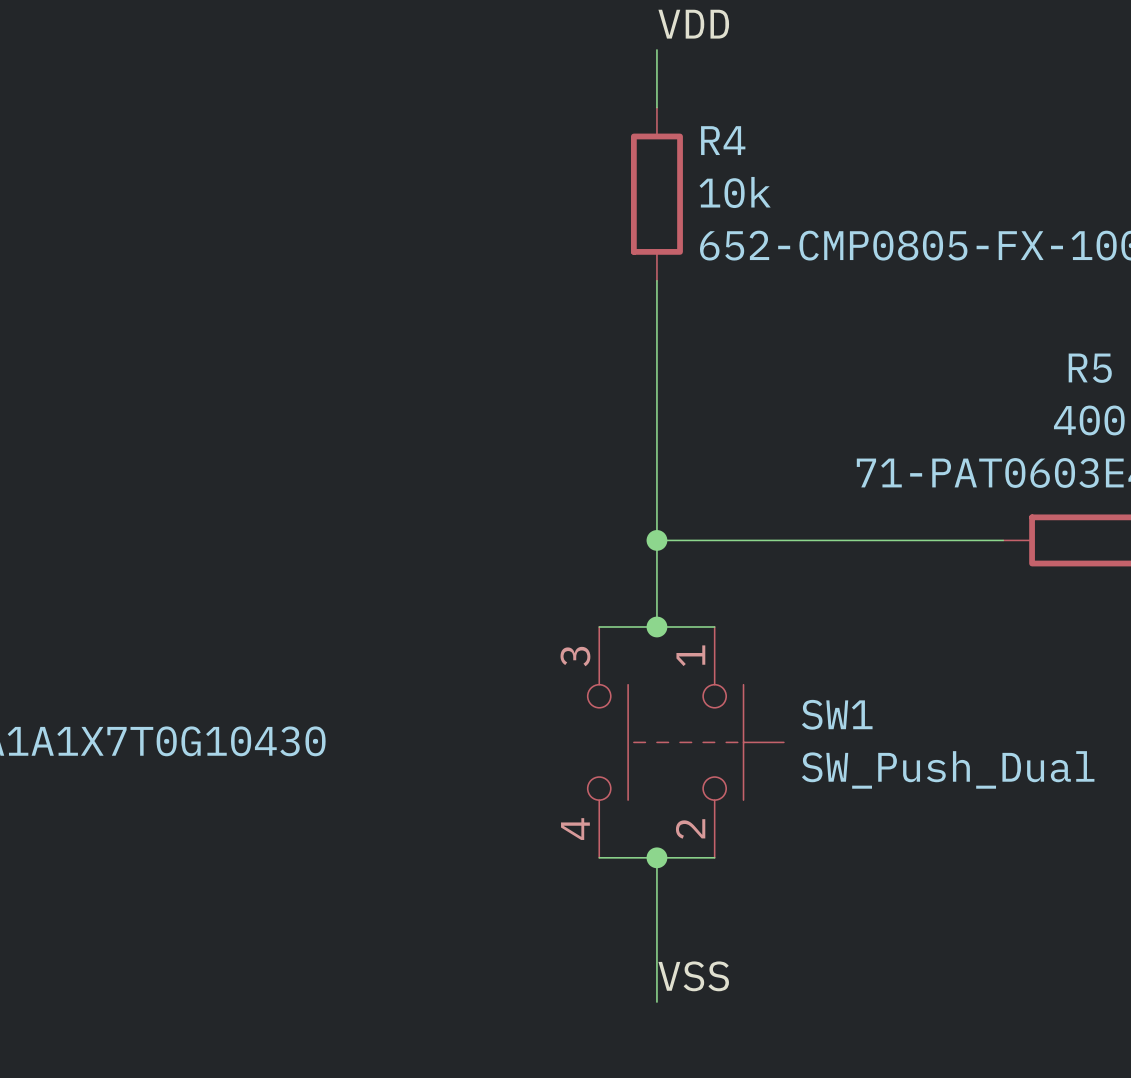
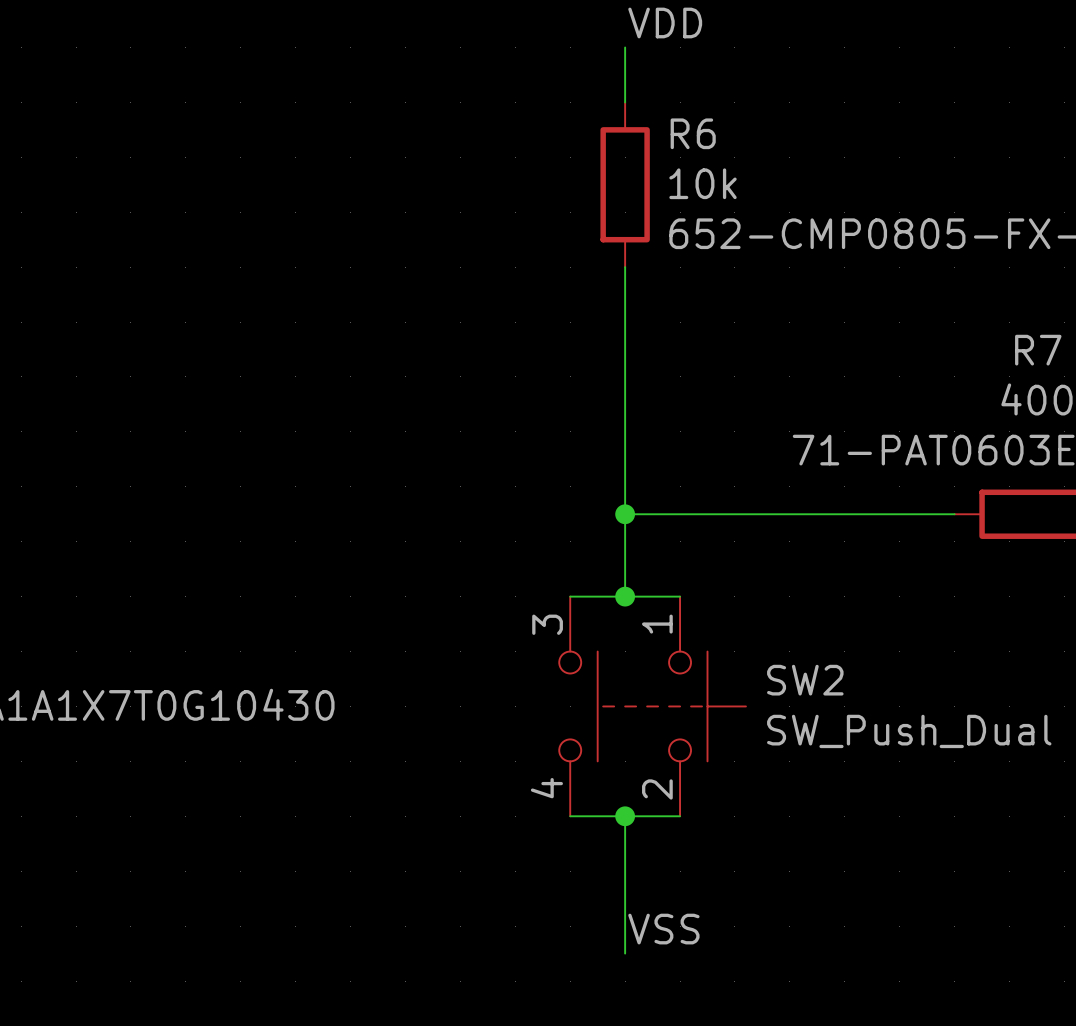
R4 name: R4 (723, 140) -> R6 (693, 133)
R5 name: R5 (1090, 368) -> R7 (1038, 350)
SW1 name: SW1 (837, 714) -> SW2 (805, 680)

